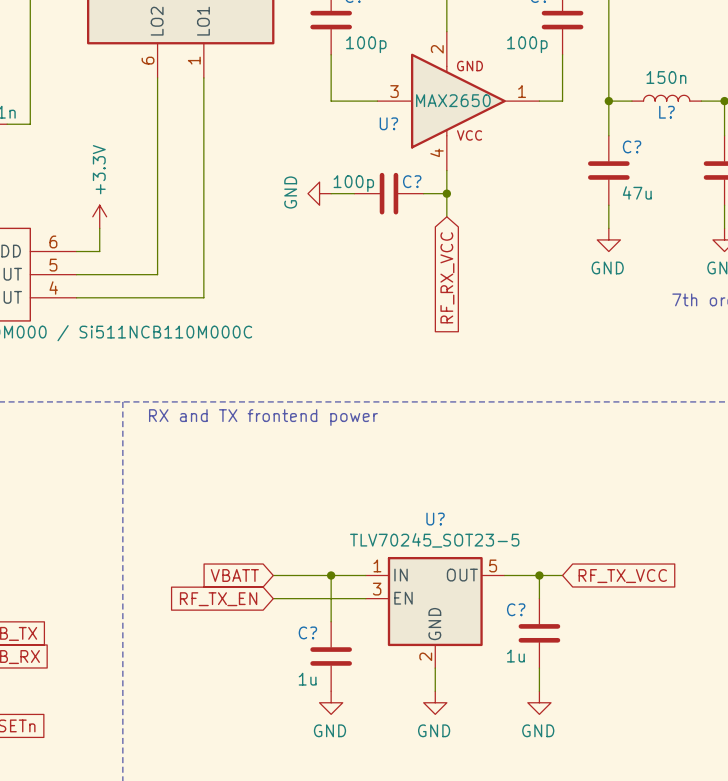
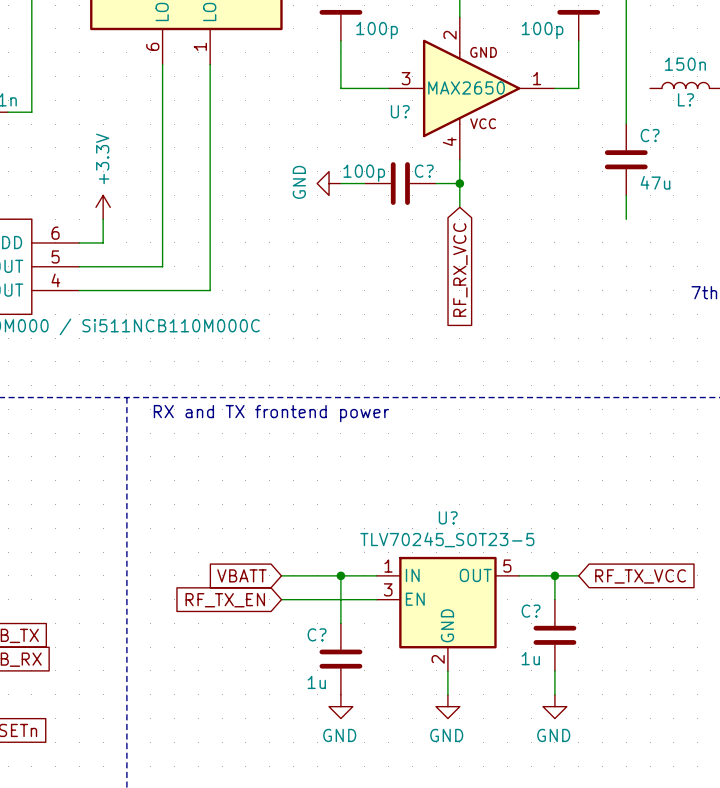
wire: (608, 101) (631, 101) -> none
junction: (608, 101) -> none
power symbol: GND (608, 239) -> none

